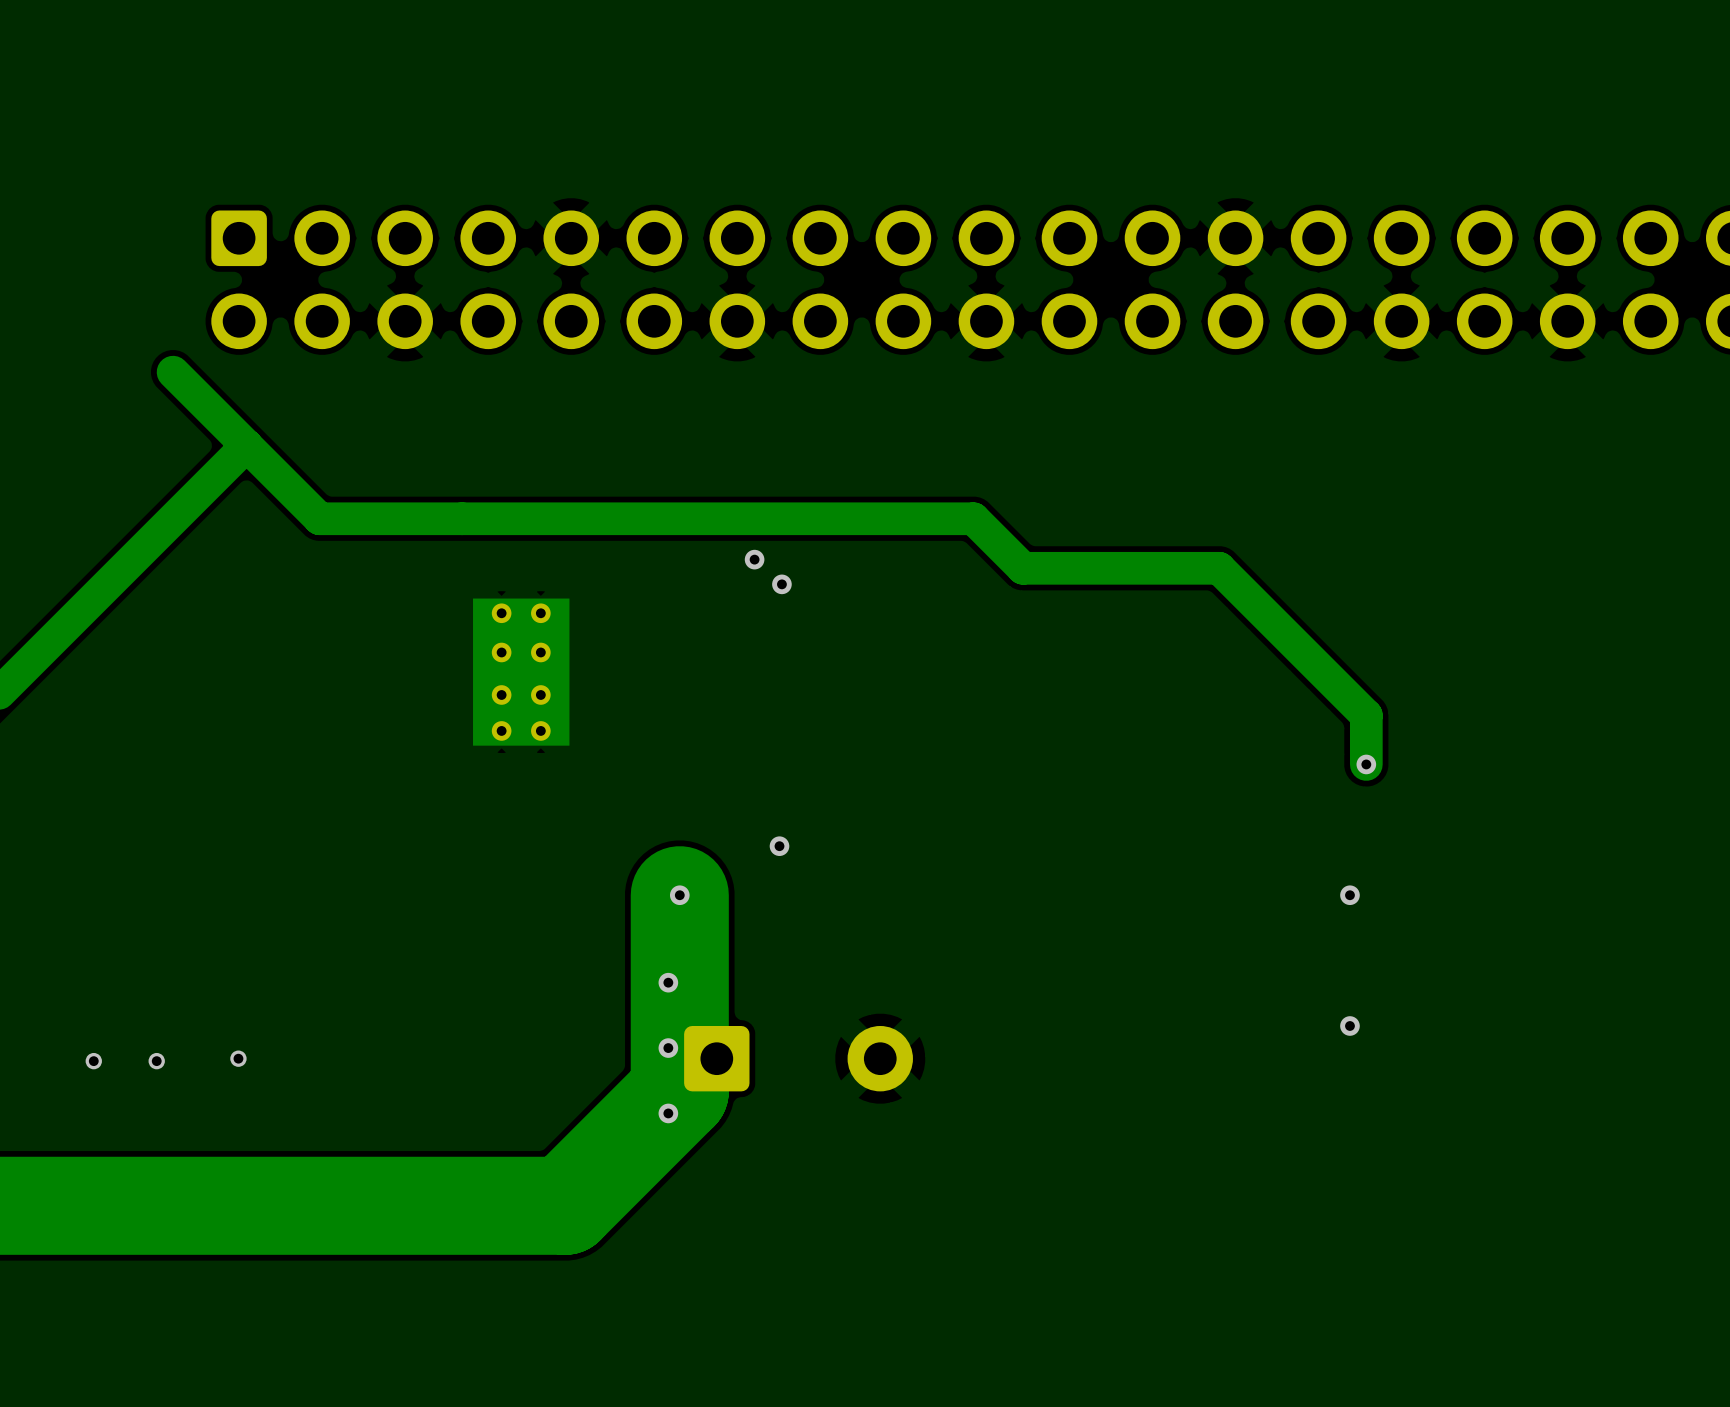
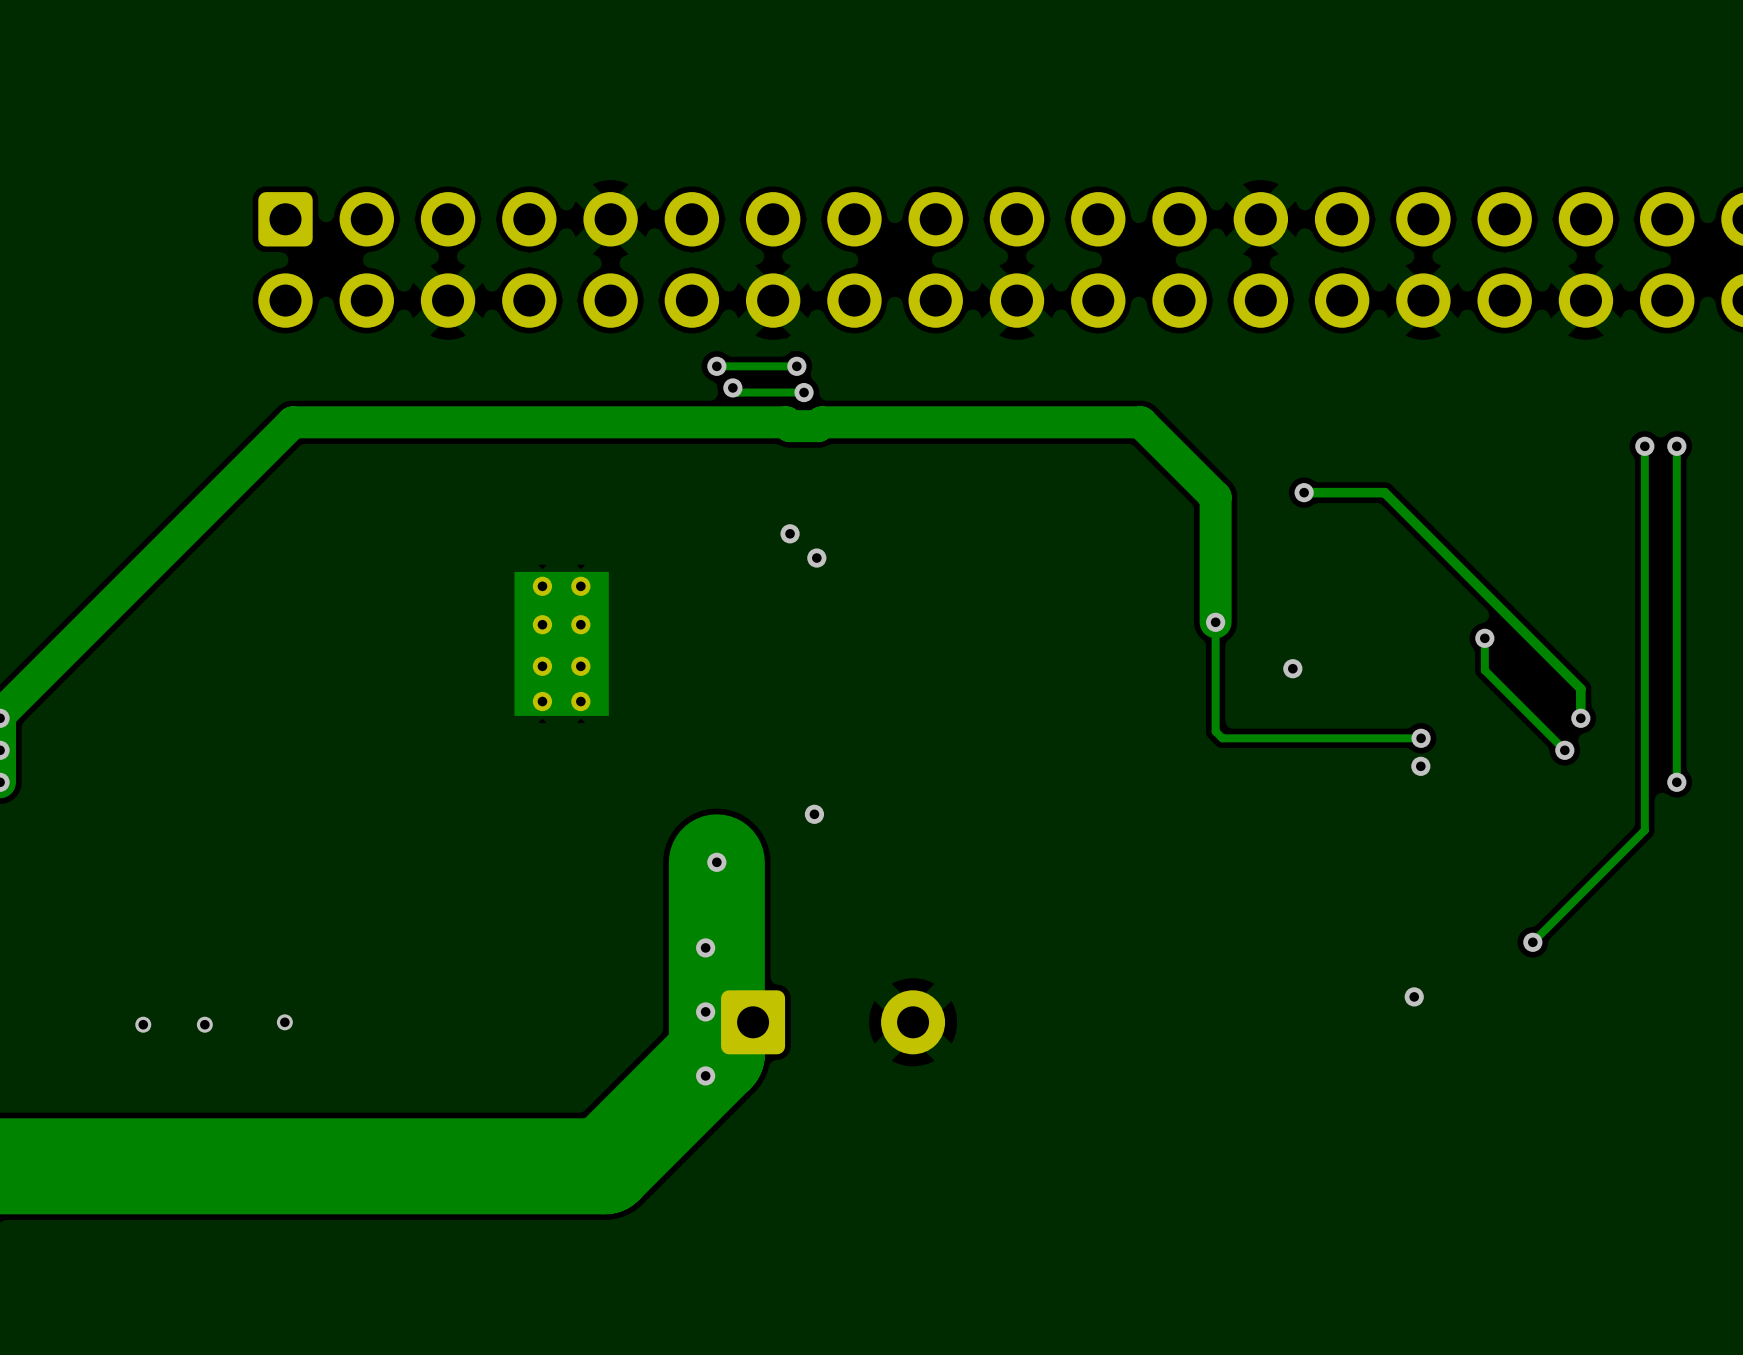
track: (173, 372) (319, 518) (973, 518) (1023, 568) (1219, 568) (1366, 715) (1366, 764) -> none
via: none -> (716, 366)
track: none -> (796, 366) (716, 366)
via: none -> (796, 366)
track: none -> (732, 387) (737, 392) (804, 392)
via: none -> (732, 387)
via: none -> (804, 392)
track: none -> (292, 422) (786, 422) (790, 426) (817, 426) (821, 422) (1140, 422) (1215, 497) (1215, 731) (1222, 738) (1421, 738)
track: none -> (1644, 446) (1644, 830) (1532, 942)
via: none -> (1644, 446)
track: none -> (1676, 446) (1676, 782)
via: none -> (1676, 446)
track: none -> (1304, 492) (1384, 492) (1580, 688) (1580, 718)
via: none -> (1304, 492)
via: none -> (1215, 622)
track: none -> (1484, 638) (1484, 670) (1564, 750)
via: none -> (1484, 638)
via: none -> (1292, 668)
via: none -> (1580, 718)
via: (1366, 764) -> none
via: none -> (1421, 738)
via: none -> (1564, 750)
via: none -> (1420, 766)
via: none -> (1676, 782)
via: (1349, 895) -> none
via: none -> (1532, 942)
via position: (1349, 1025) -> (1414, 996)

